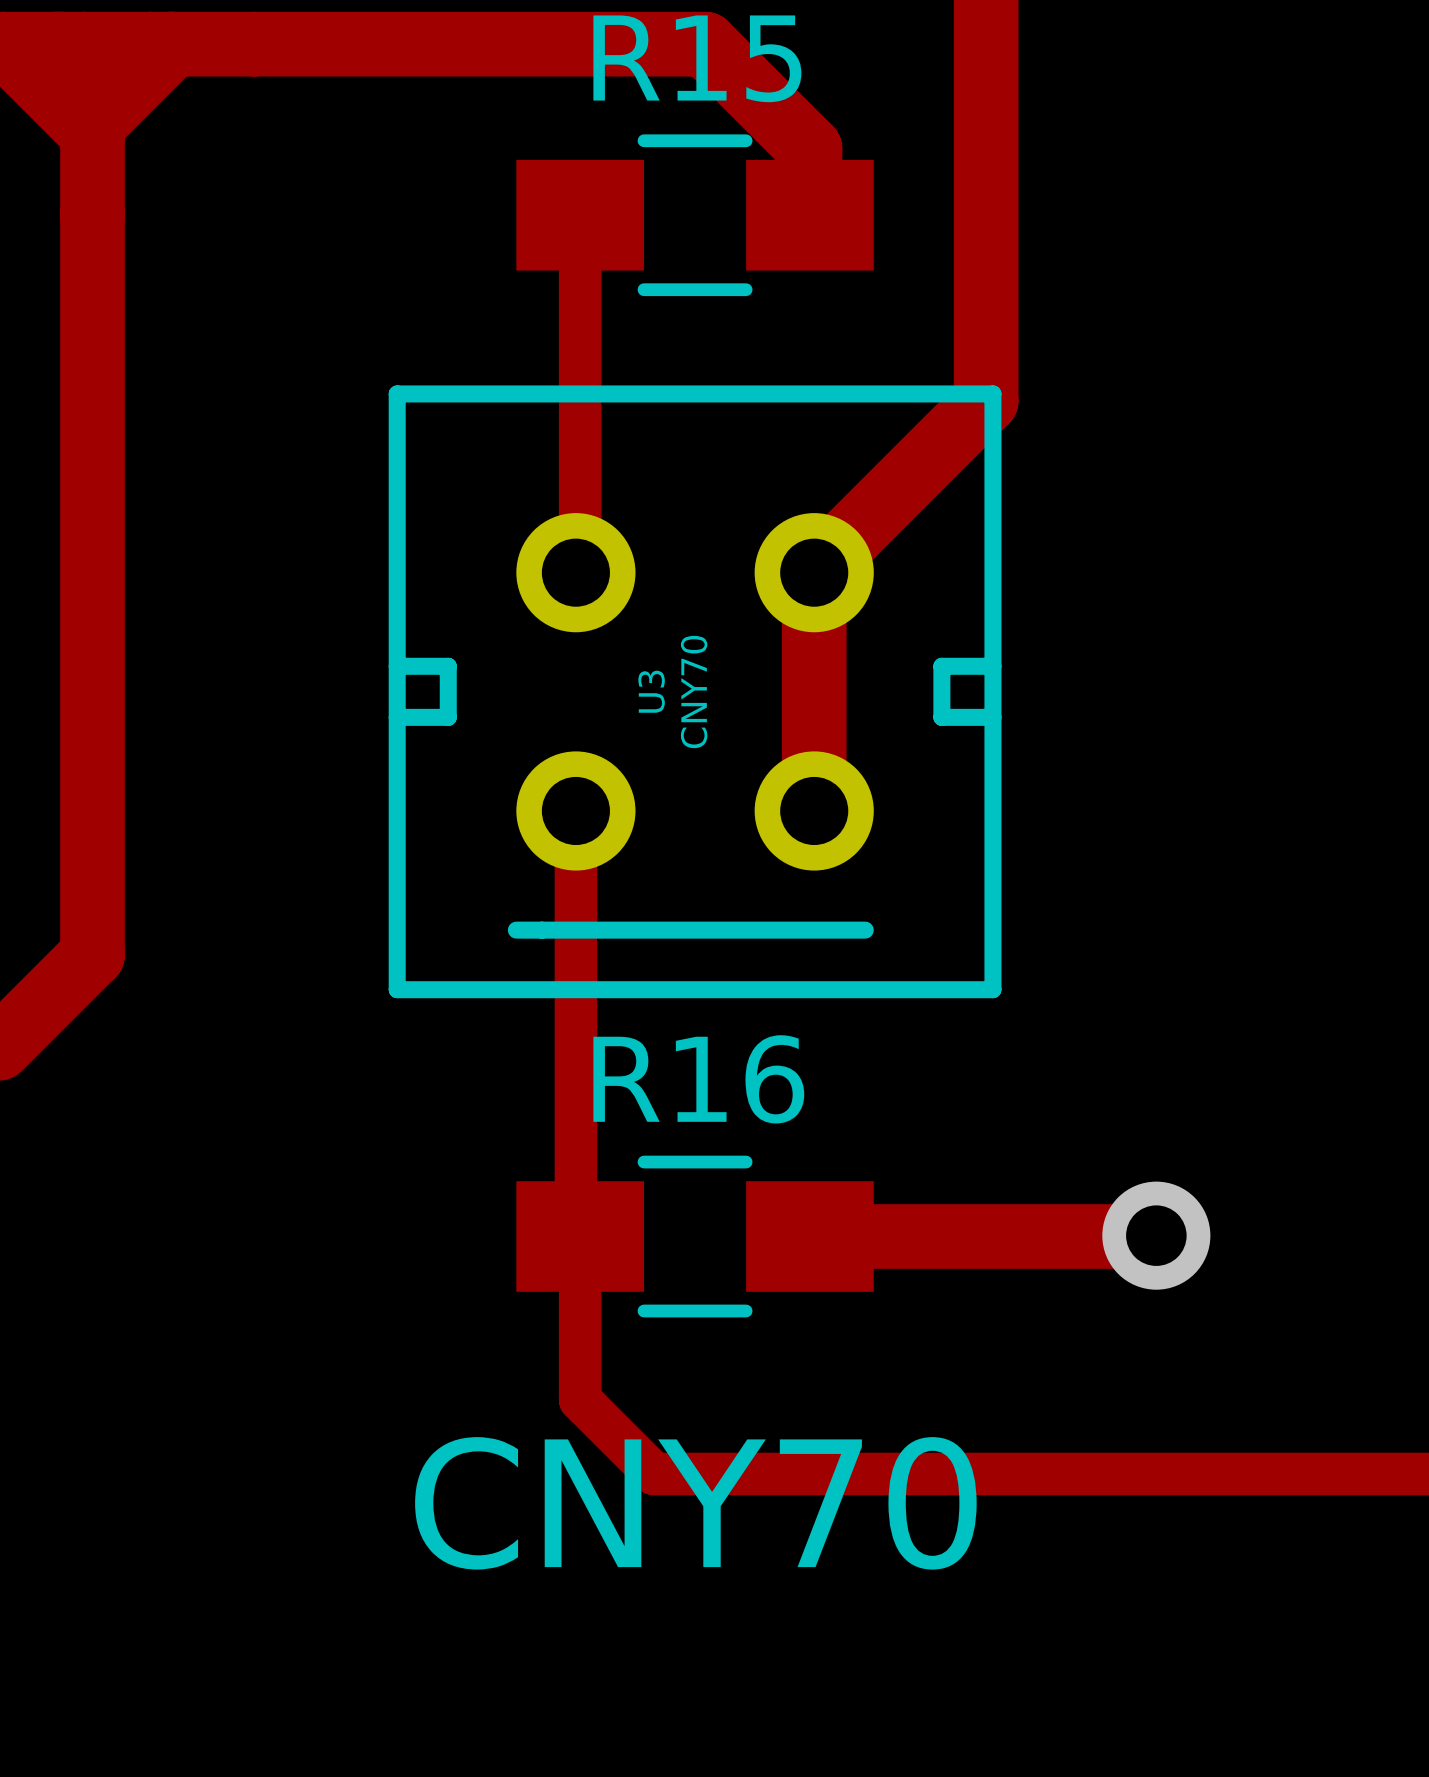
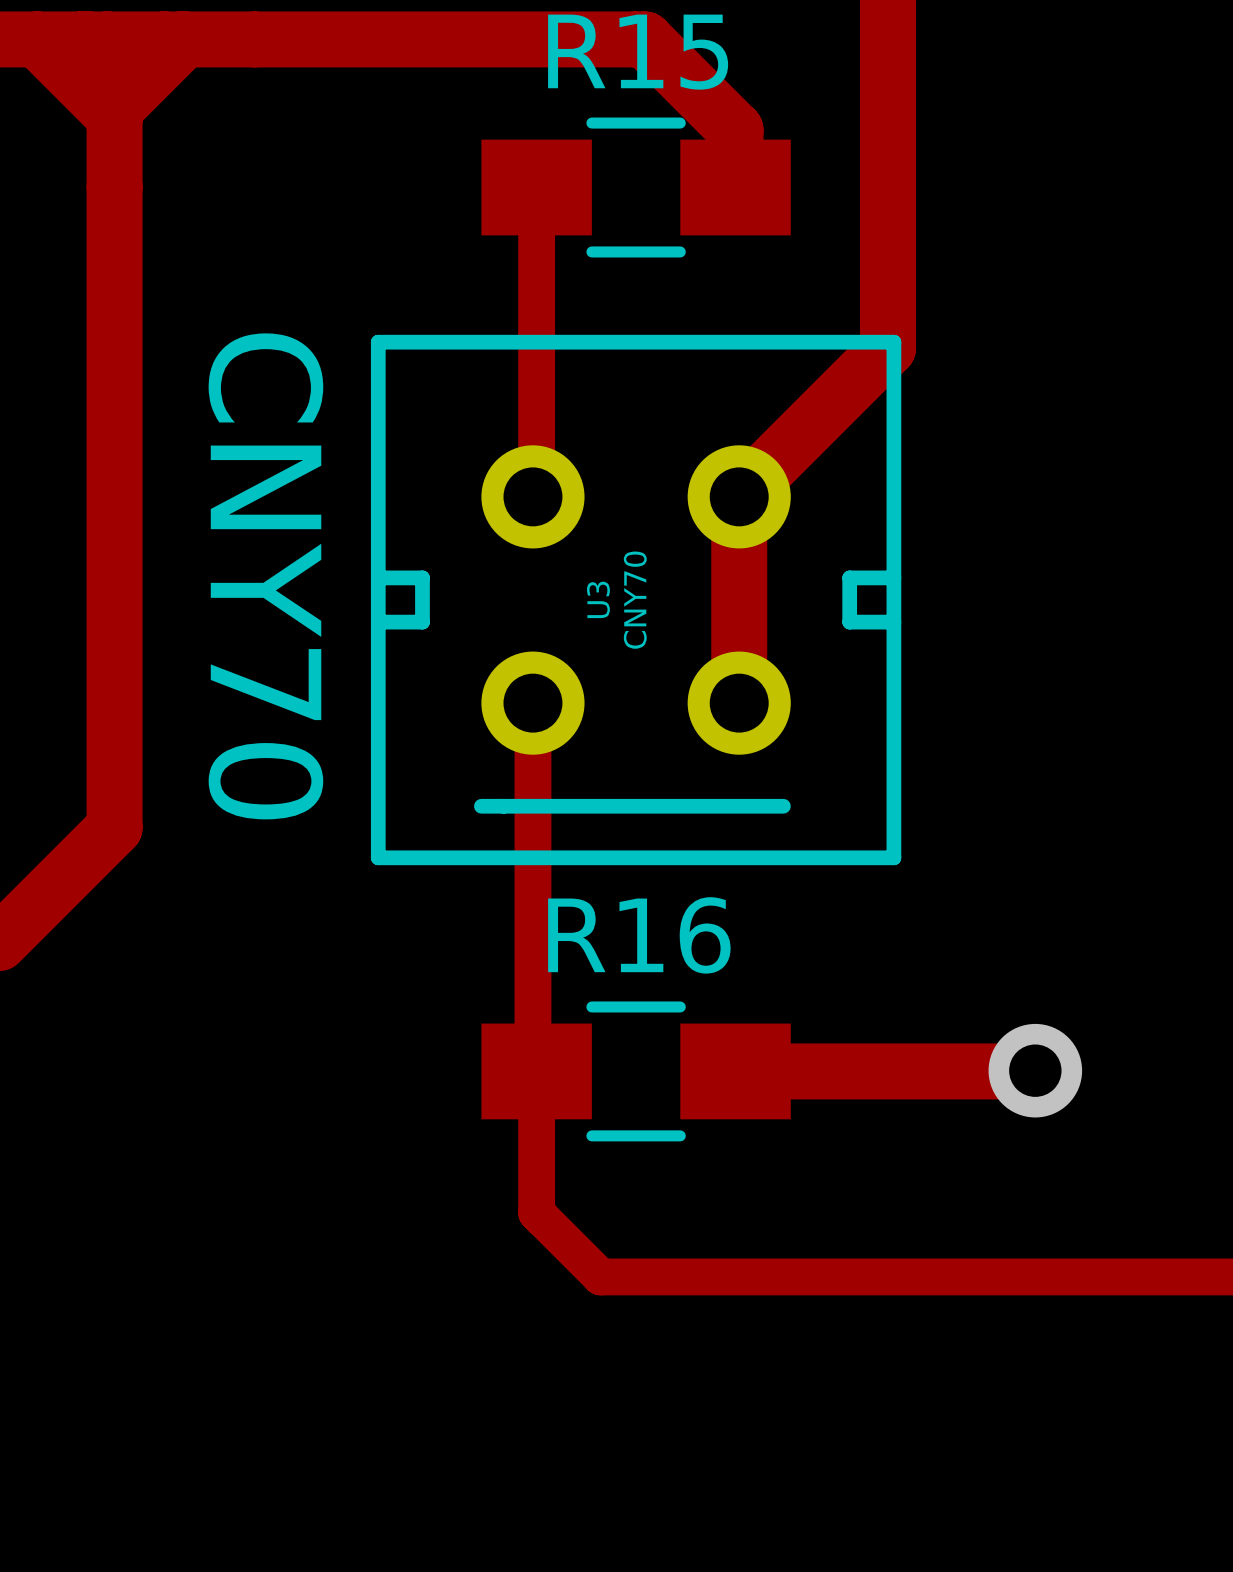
text rotation: 0° (695, 1503) -> 90° clockwise (265, 576)
text position: CNY70 (695, 1503) -> CNY70 (265, 576)

